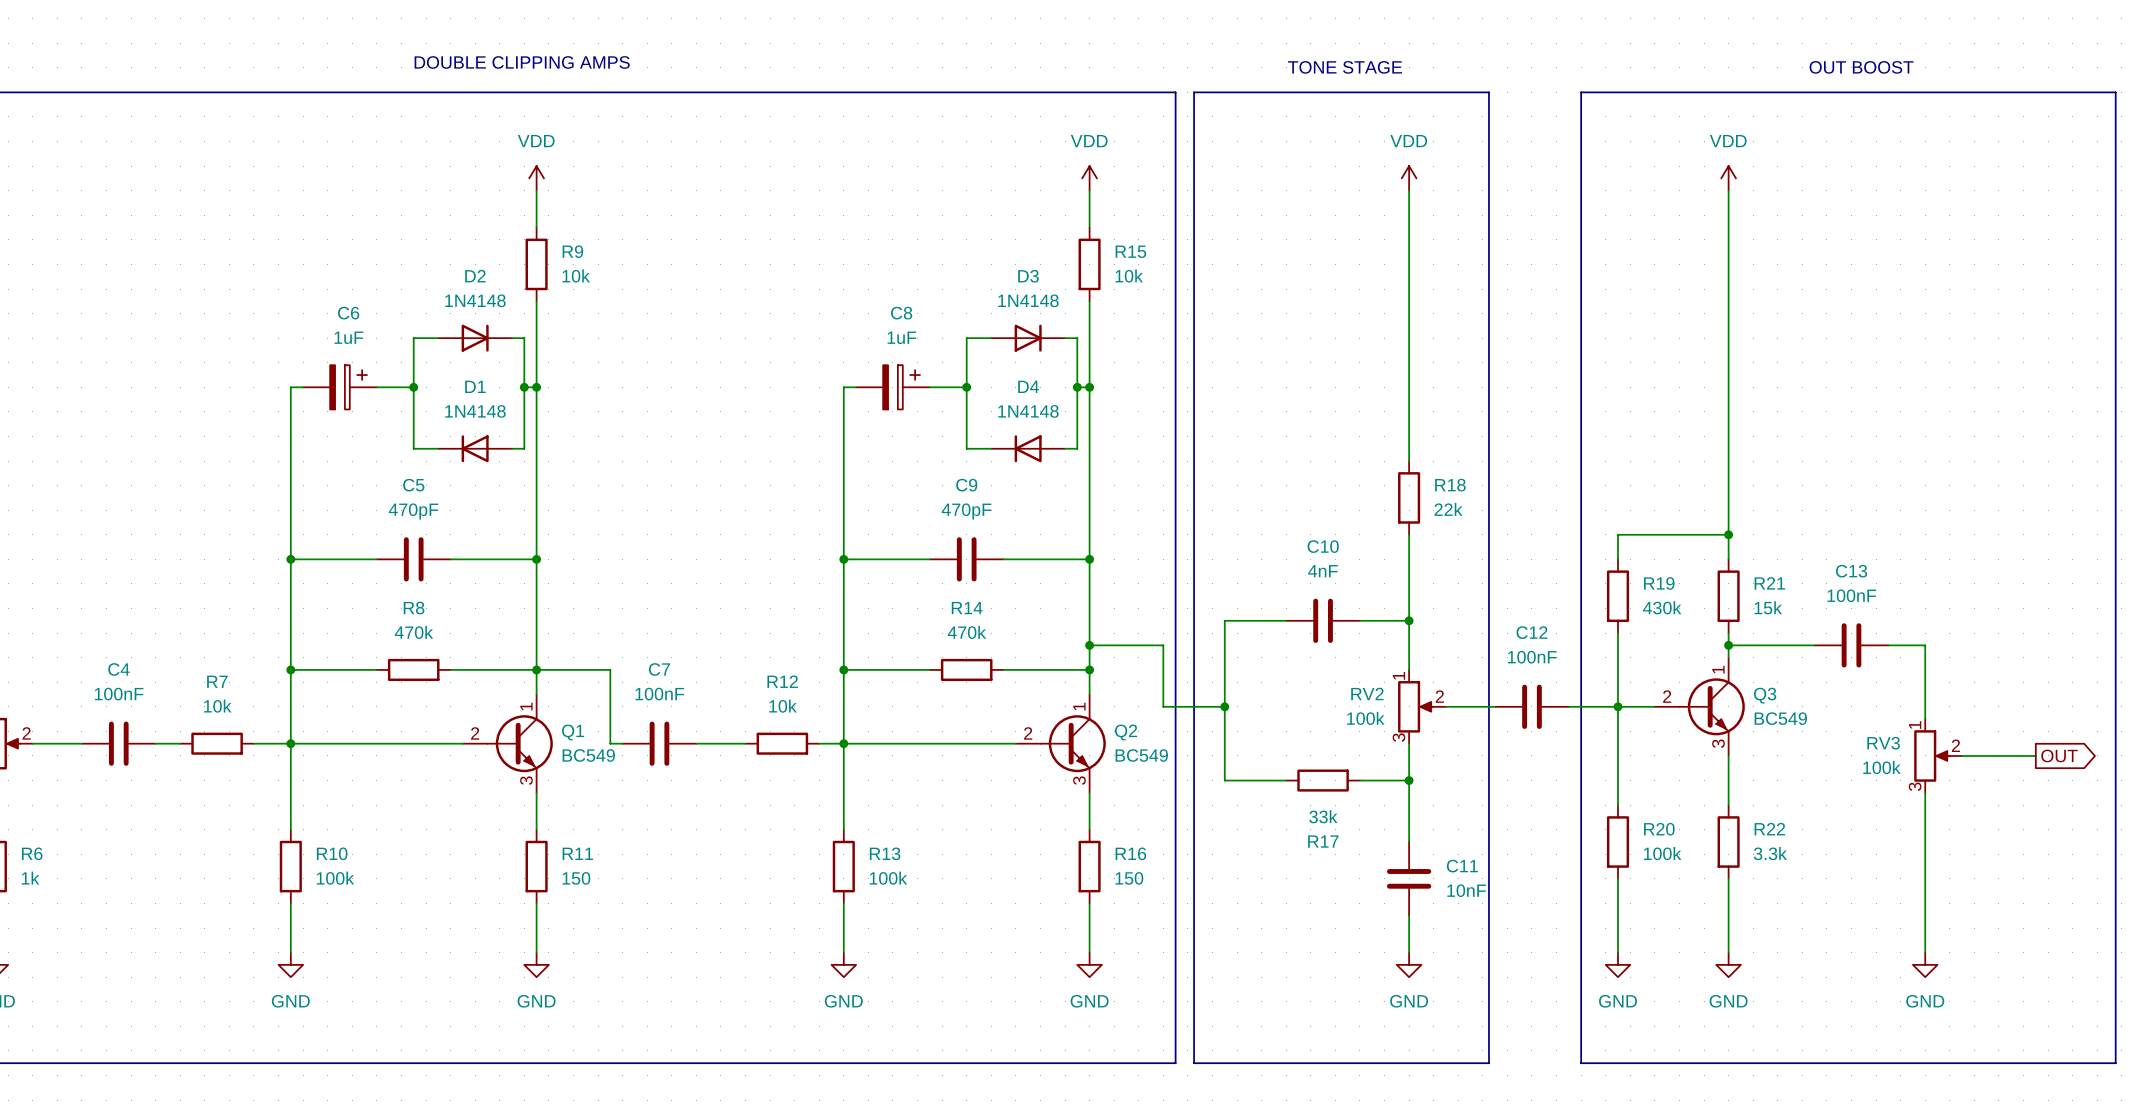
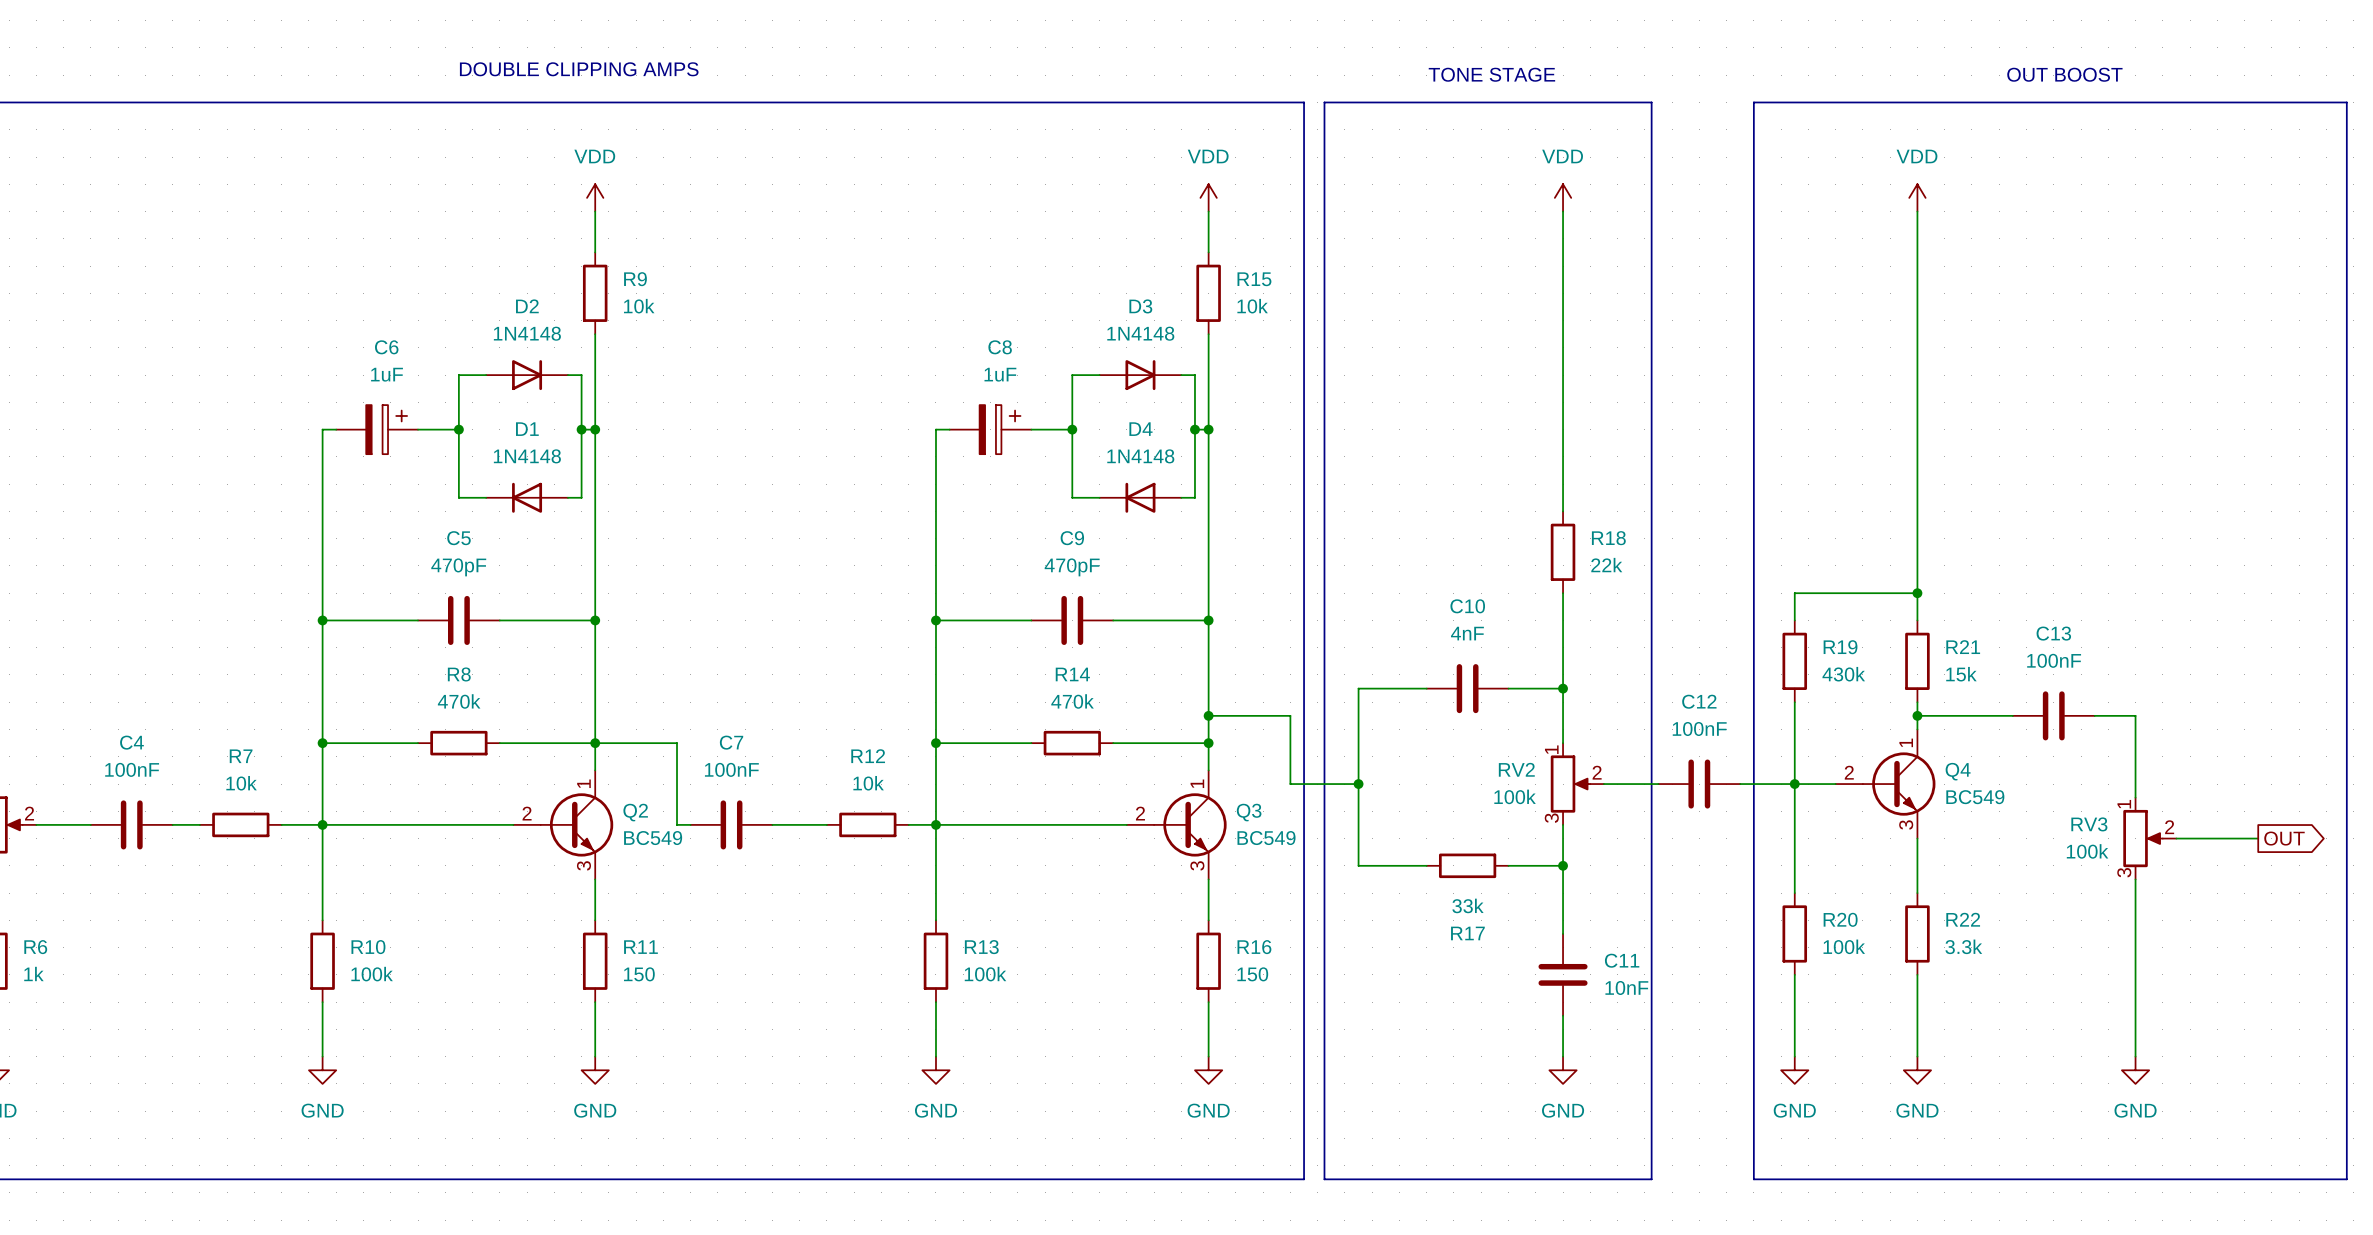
Q3 name: Q3 (1765, 695) -> Q4 (1958, 771)
Q1 name: Q1 (573, 732) -> Q2 (635, 812)
Q2 name: Q2 (1126, 732) -> Q3 (1249, 812)

